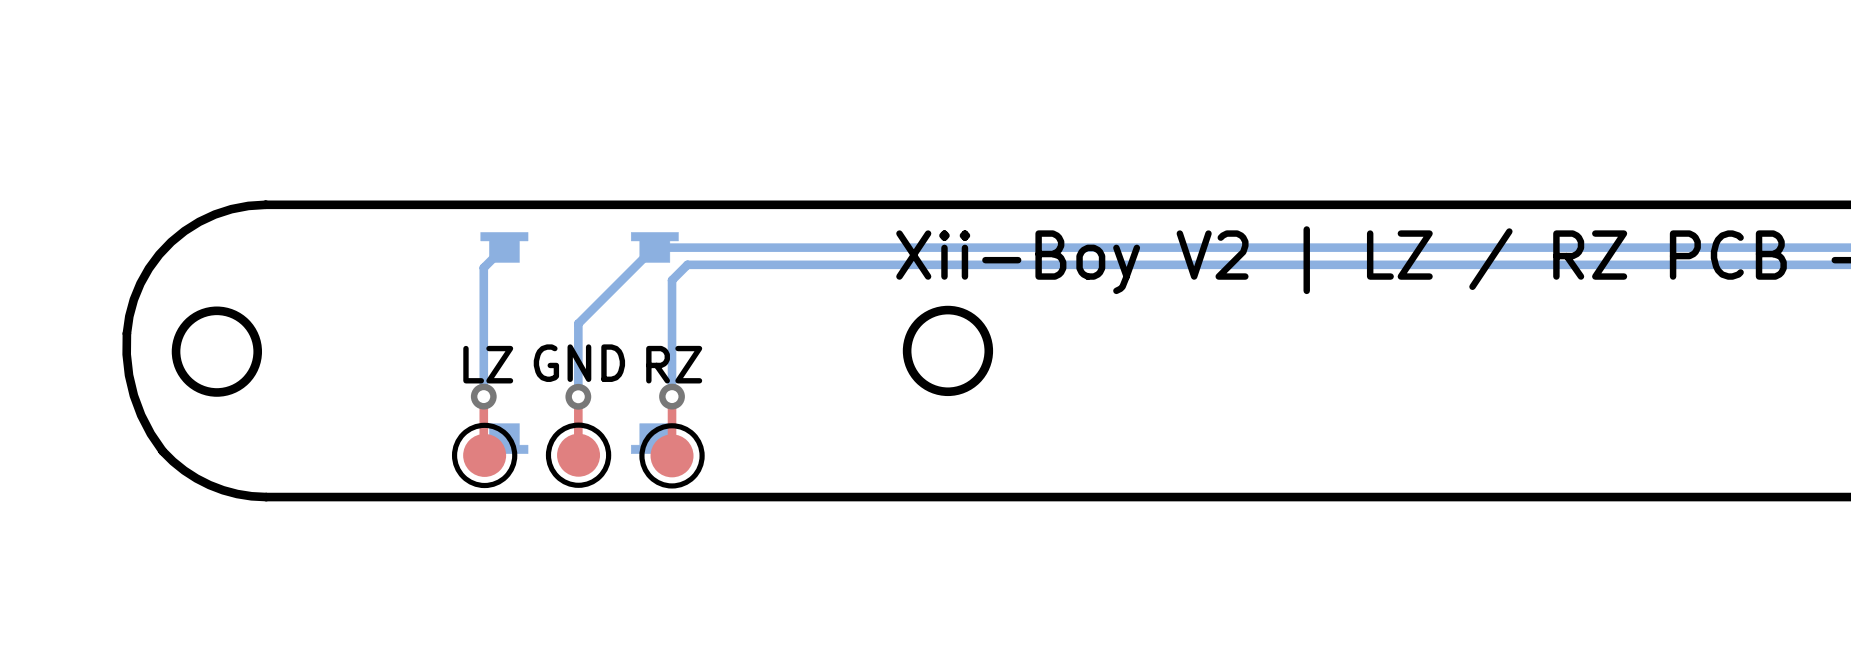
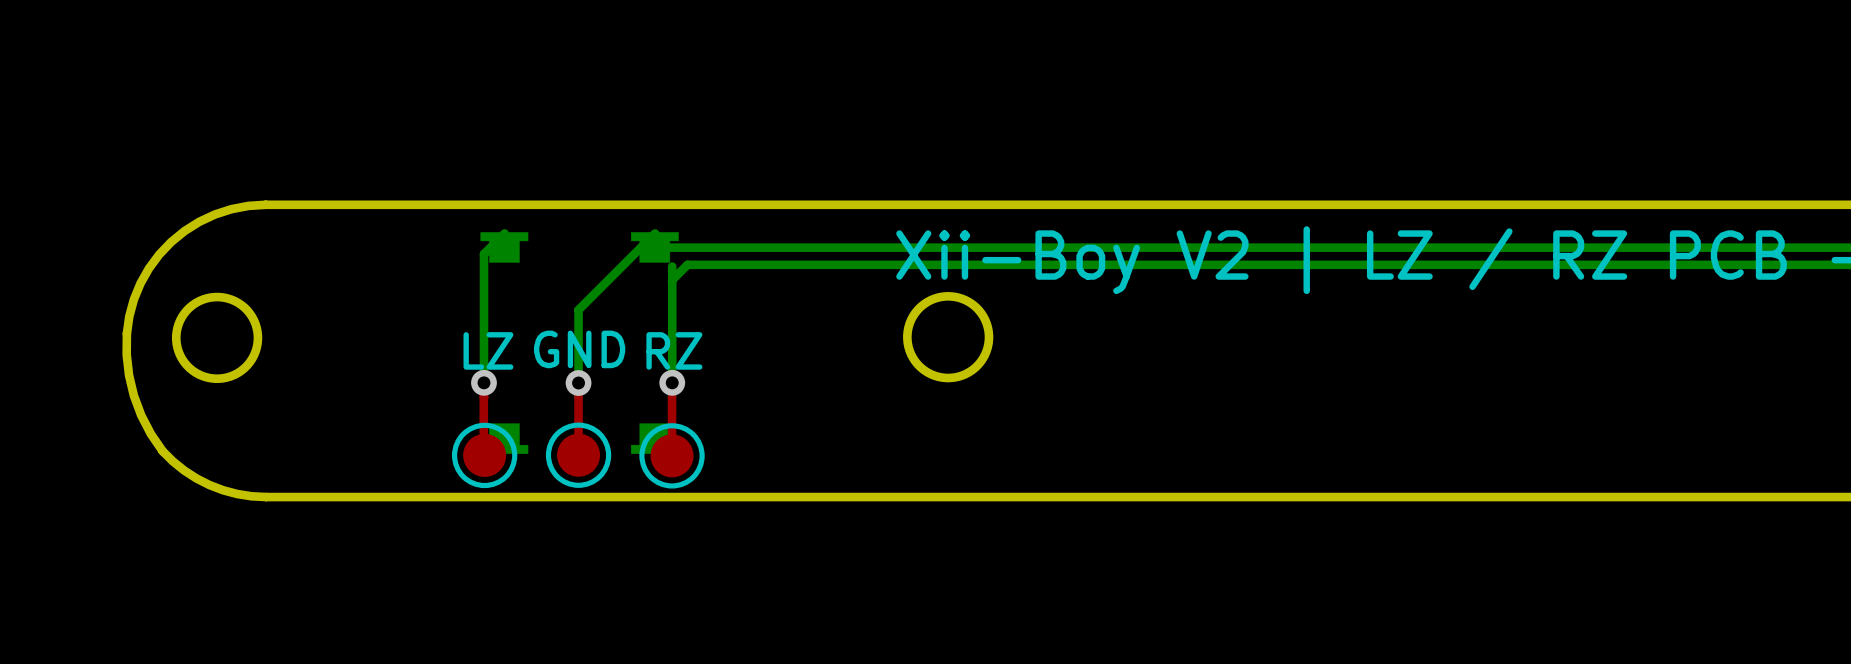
bottom track: (504, 247) (483, 267) (483, 396) -> (504, 233) (483, 254) (483, 382)
bottom track: (654, 247) (578, 323) -> (655, 233) (578, 309) (578, 323)
round board edge position: (947, 350) -> (948, 337)
round board edge position: (216, 351) -> (217, 337)
text position: GND (579, 363) -> GND (579, 349)
text position: LZ (488, 364) -> LZ (488, 350)
text position: RZ (674, 364) -> RZ (674, 350)
via position: (483, 396) -> (483, 382)
via position: (578, 396) -> (578, 383)
via position: (672, 396) -> (672, 382)

